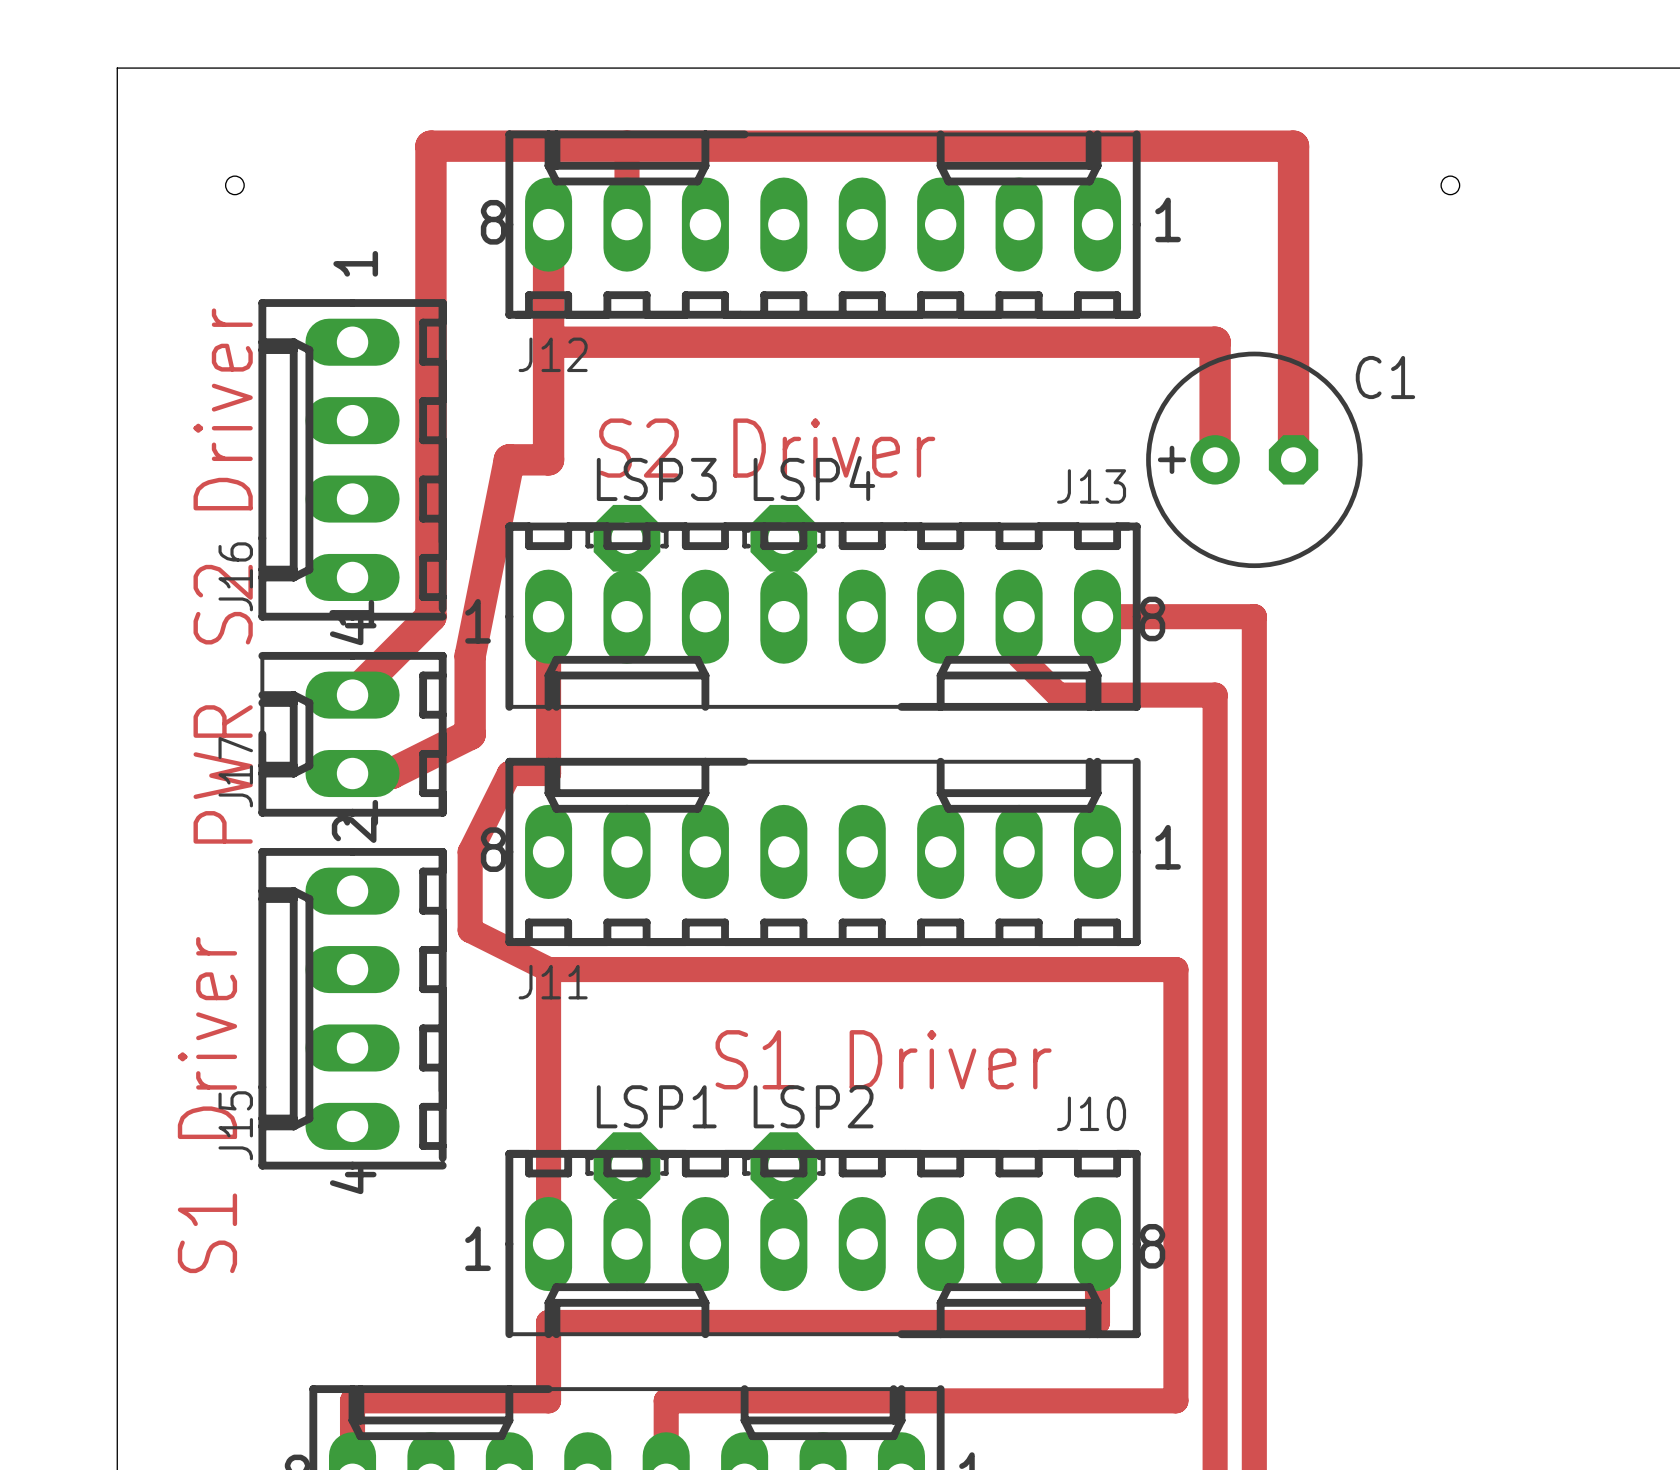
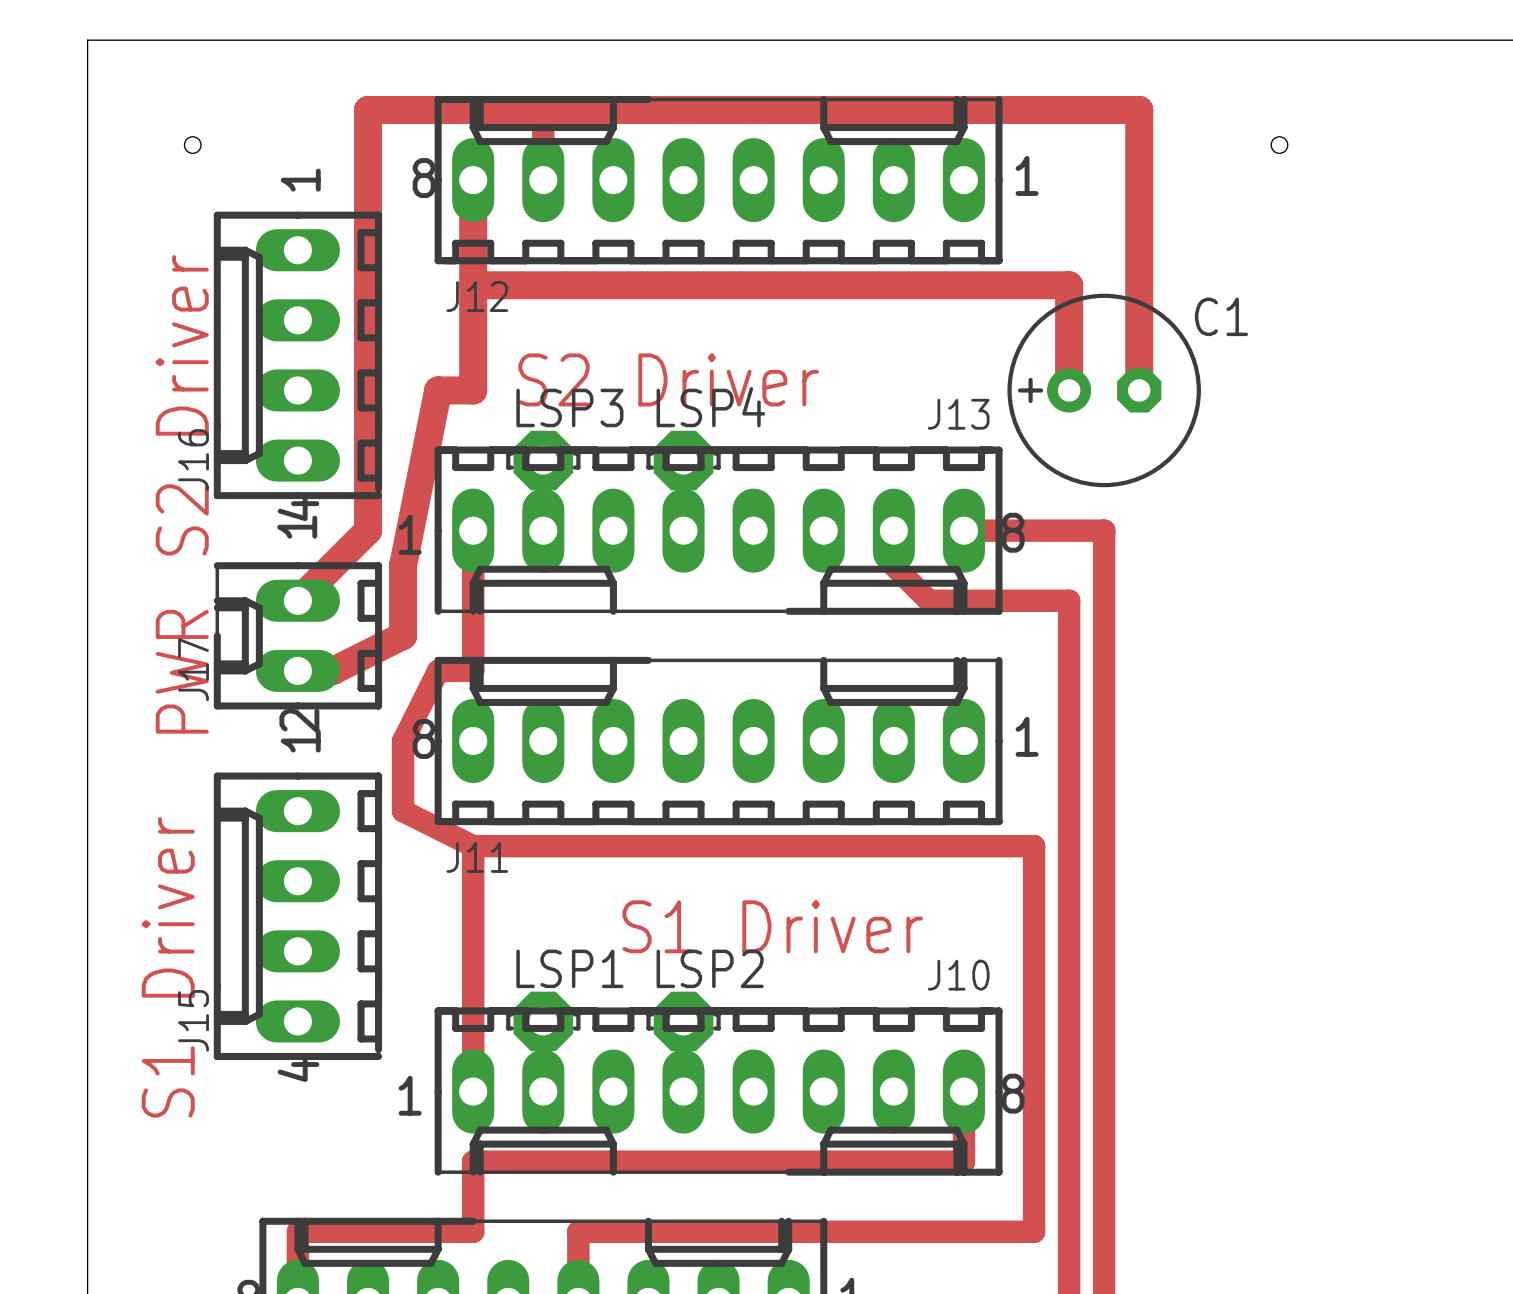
J16 position: (352, 459) -> (297, 355)
J15 position: (352, 1008) -> (297, 916)

